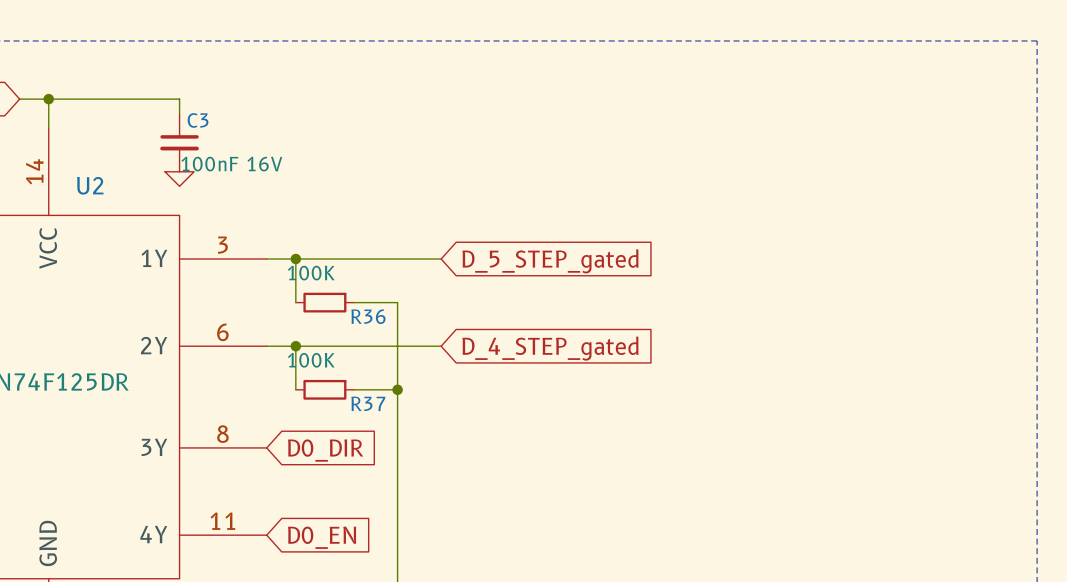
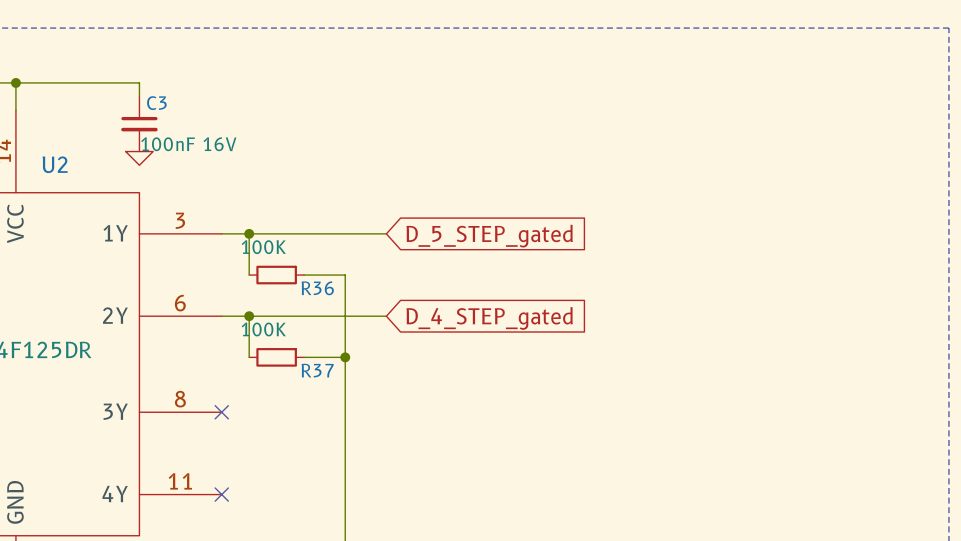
no-connect mark: none -> (221, 412)
global label: D0_DIR (325, 450) -> none
no-connect mark: none -> (221, 494)
global label: D0_EN (322, 537) -> none

